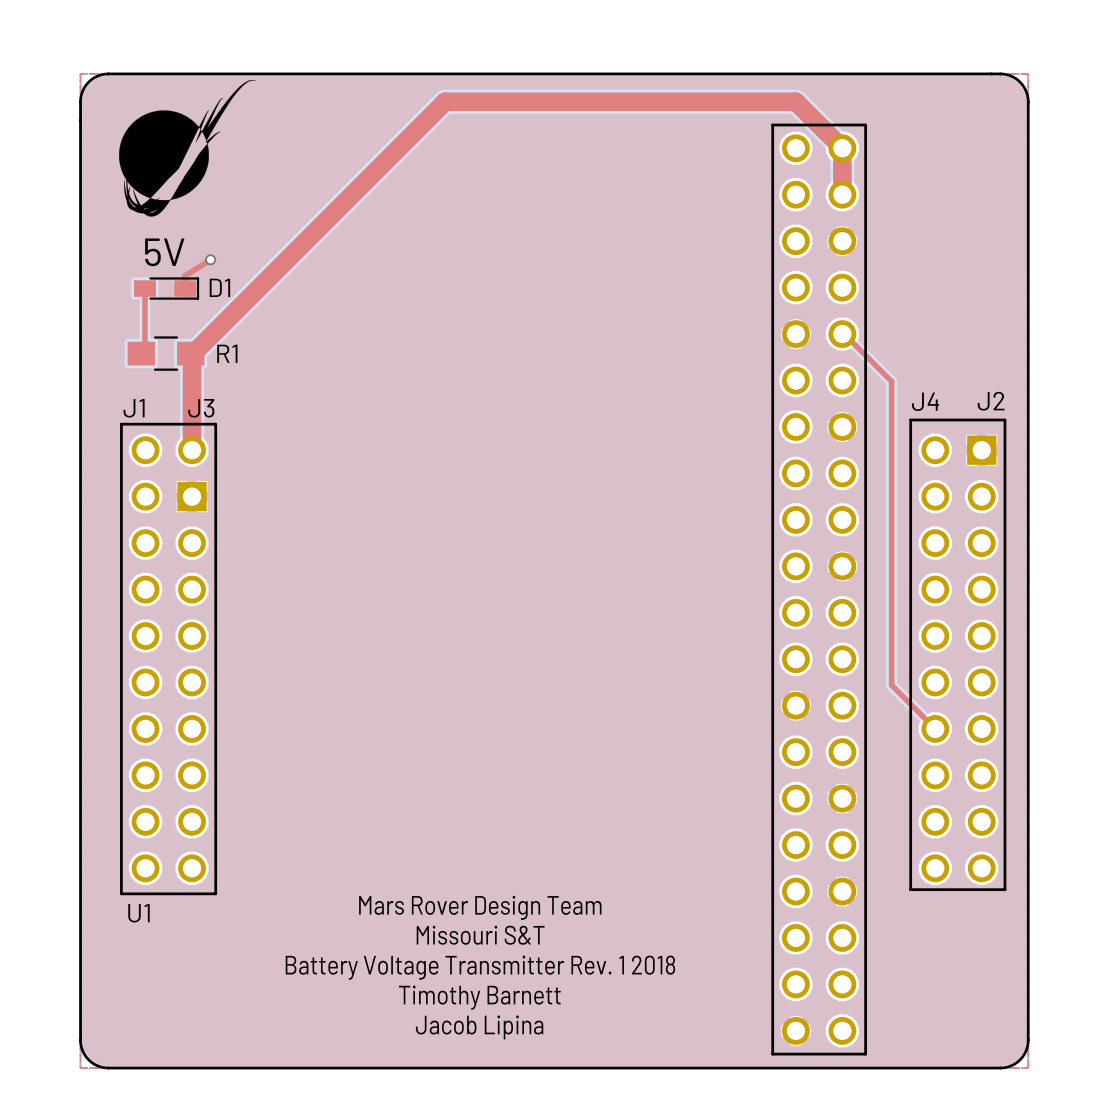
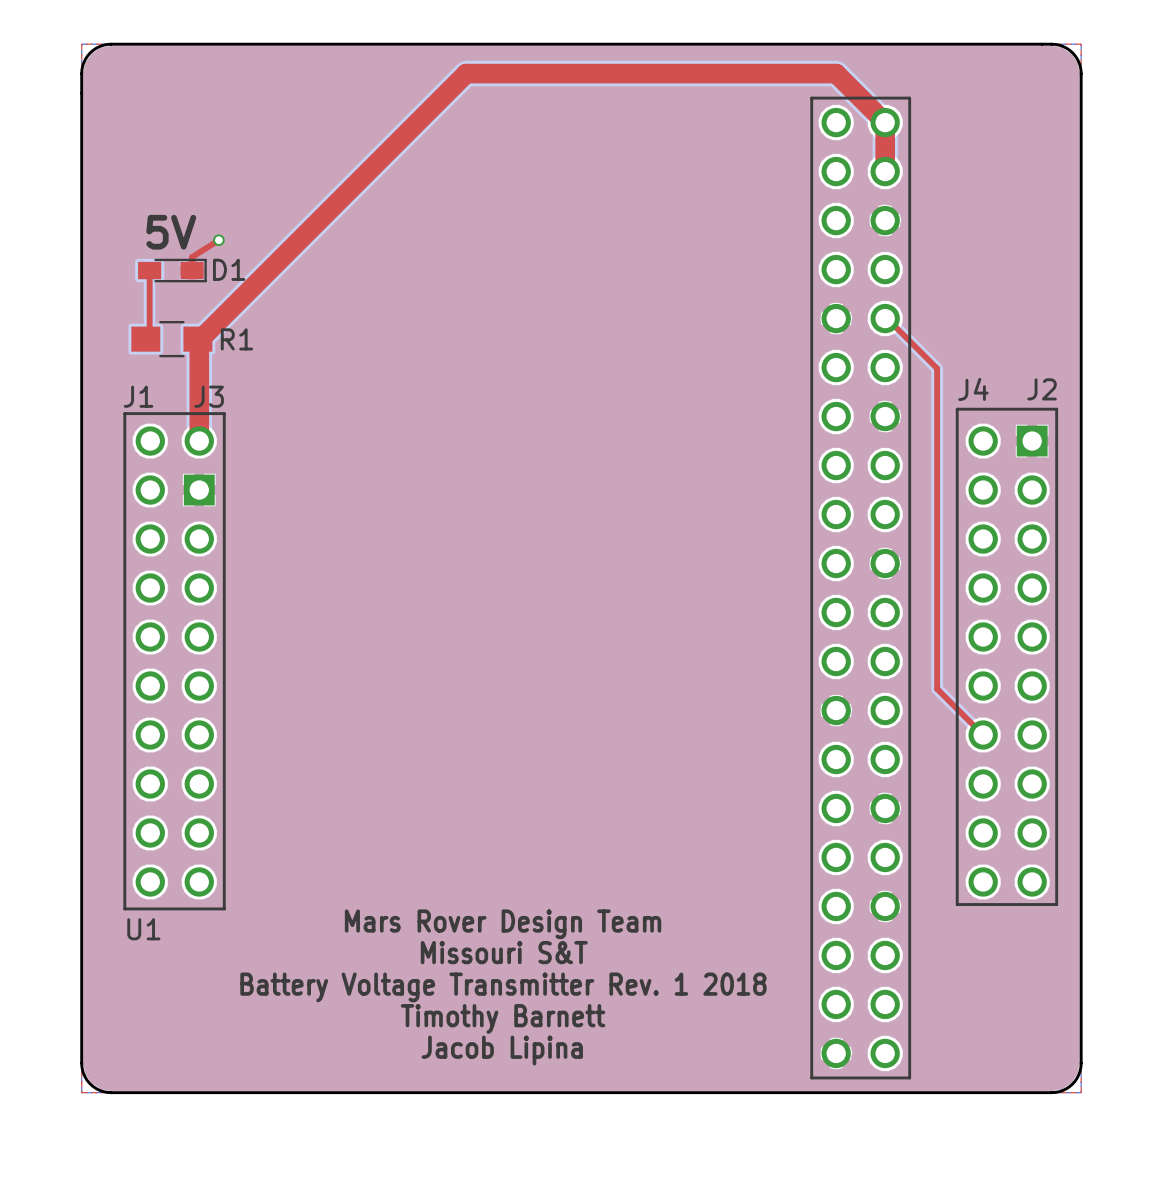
drawing: [119, 79, 256, 217] -> none

